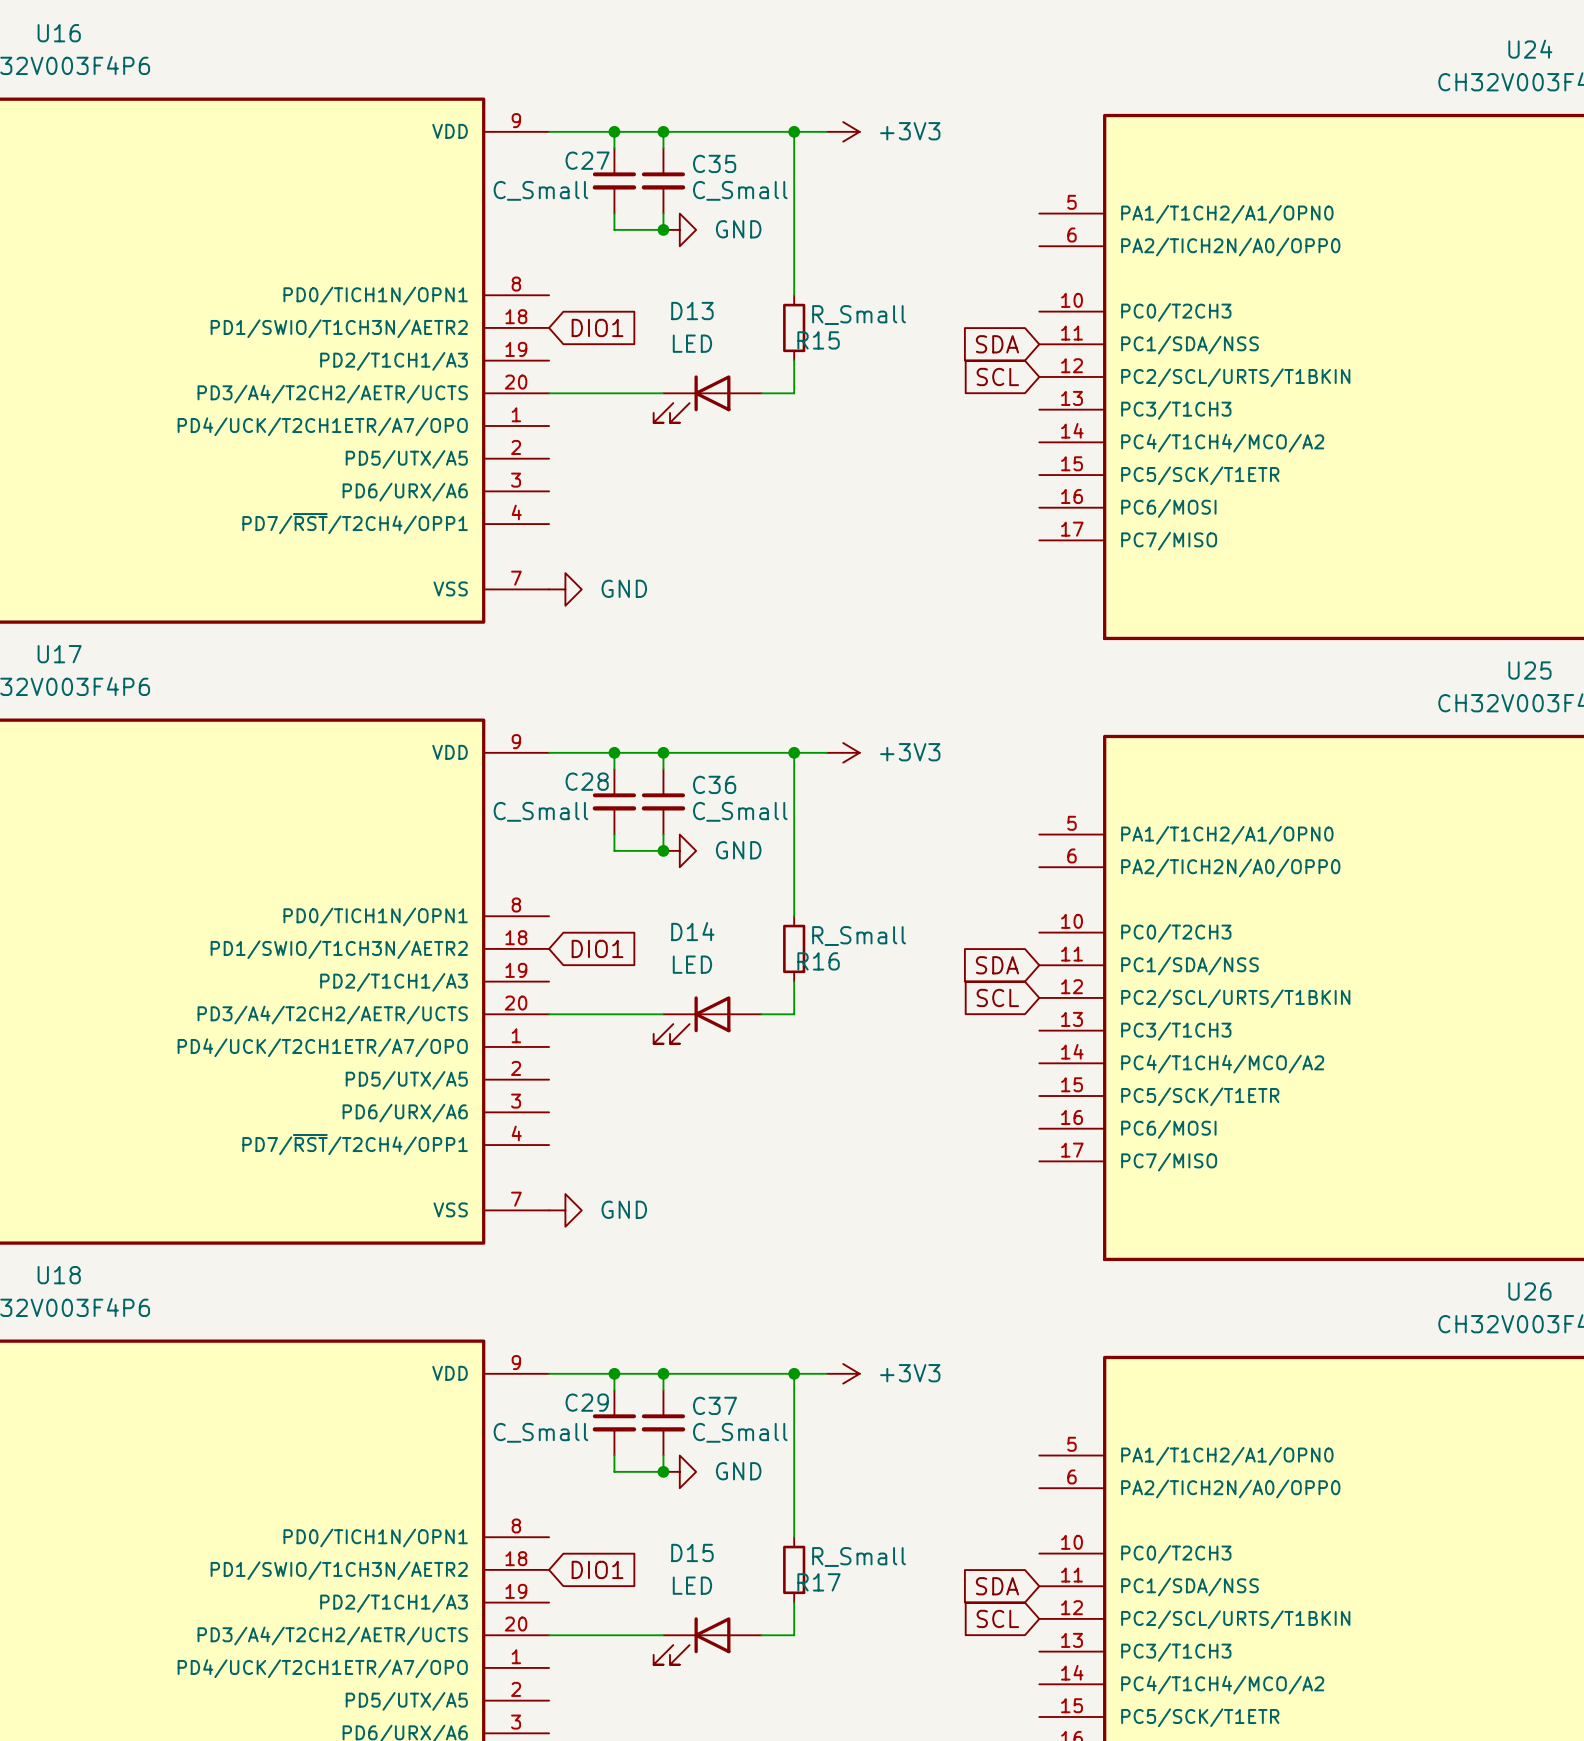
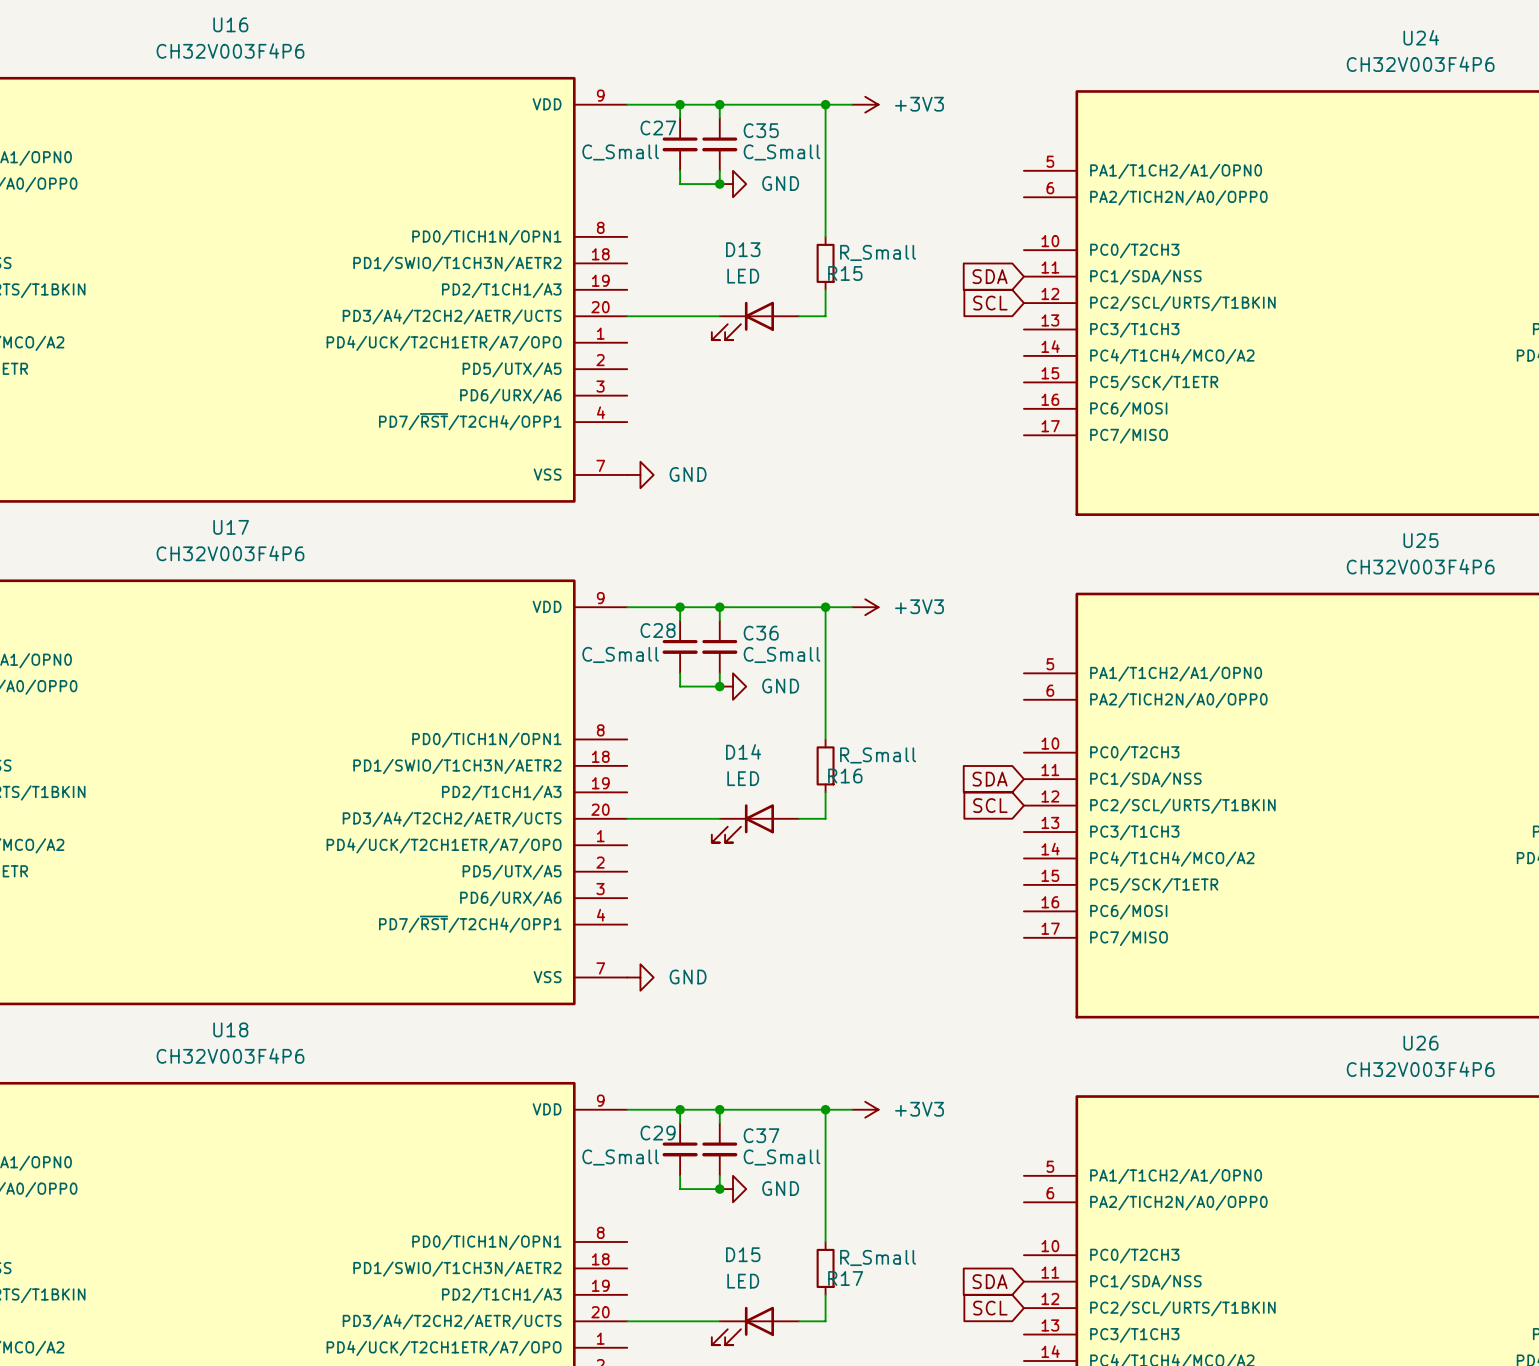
global label: DIO1 (597, 327) -> none
global label: DIO1 (597, 948) -> none
global label: DIO1 (597, 1569) -> none

